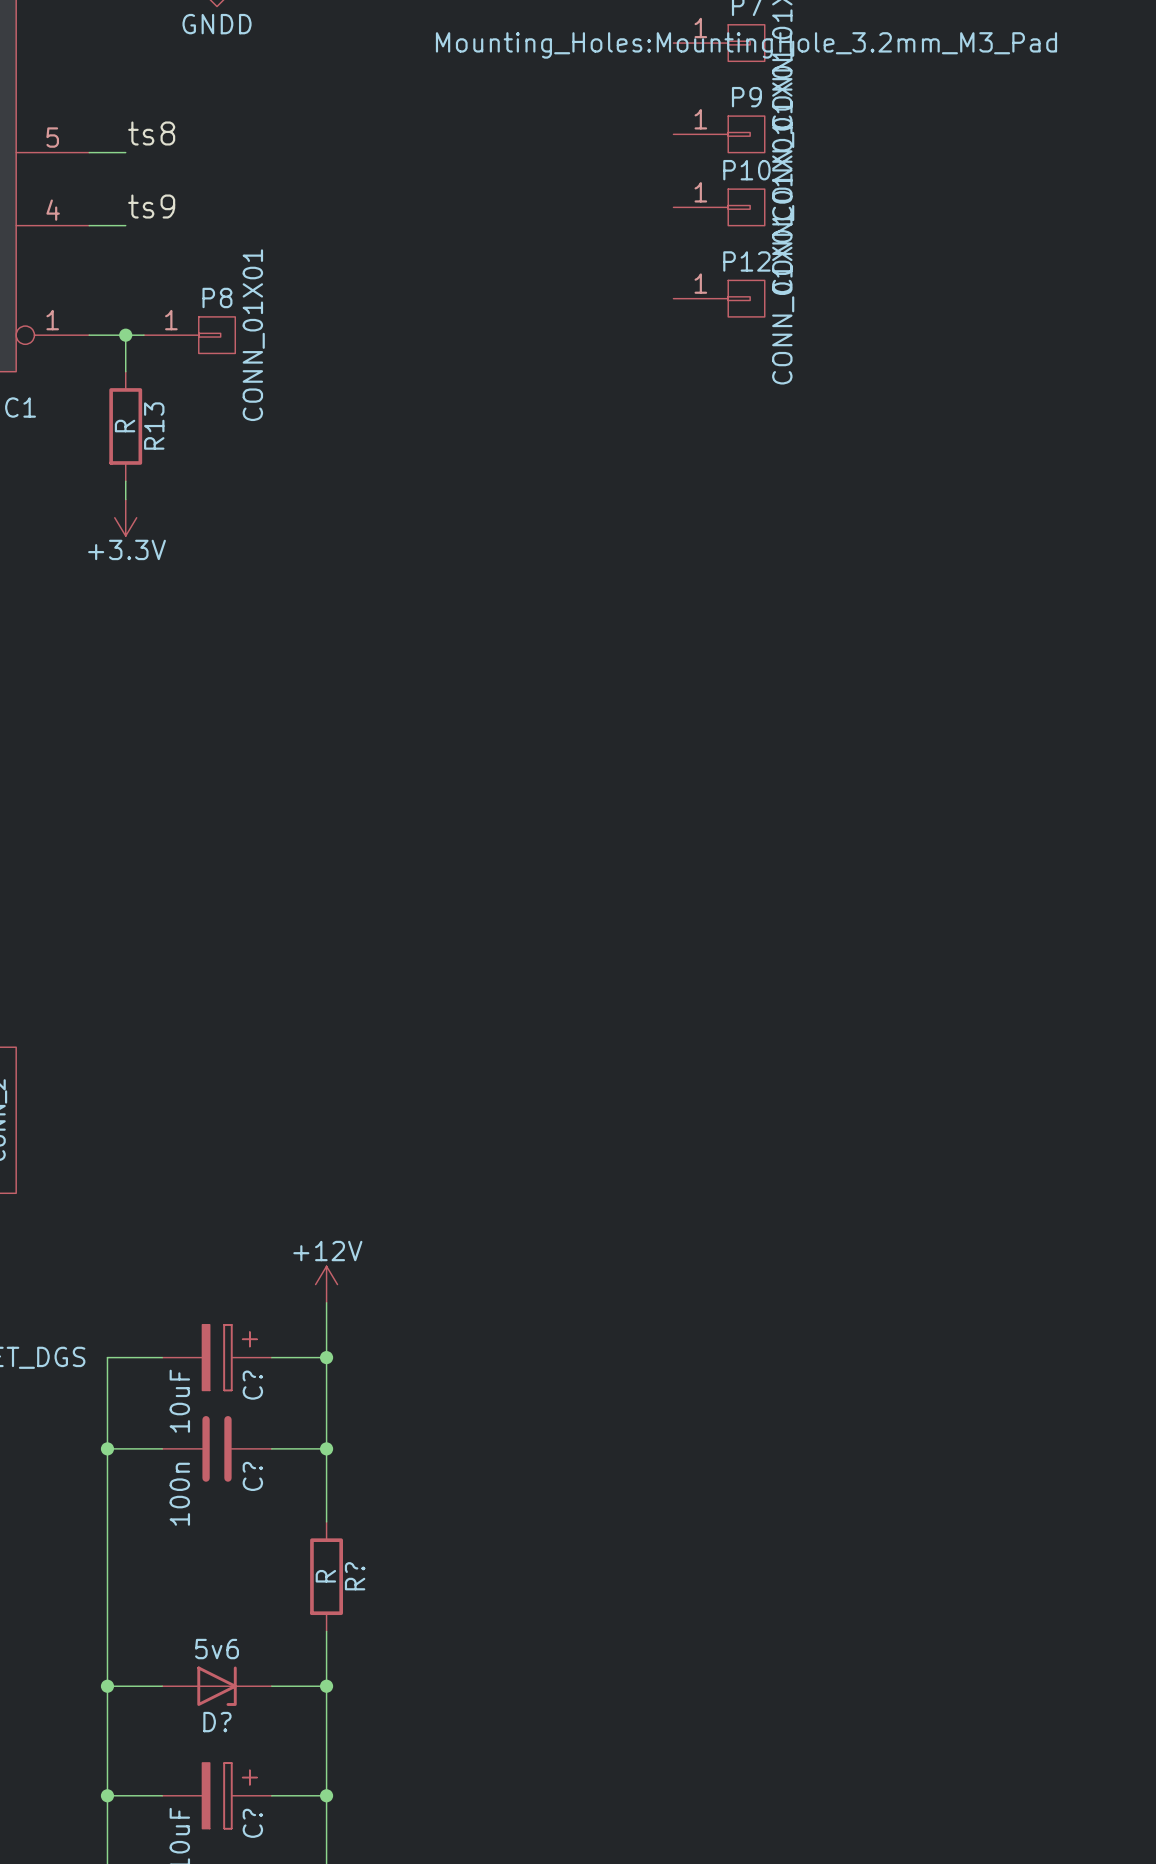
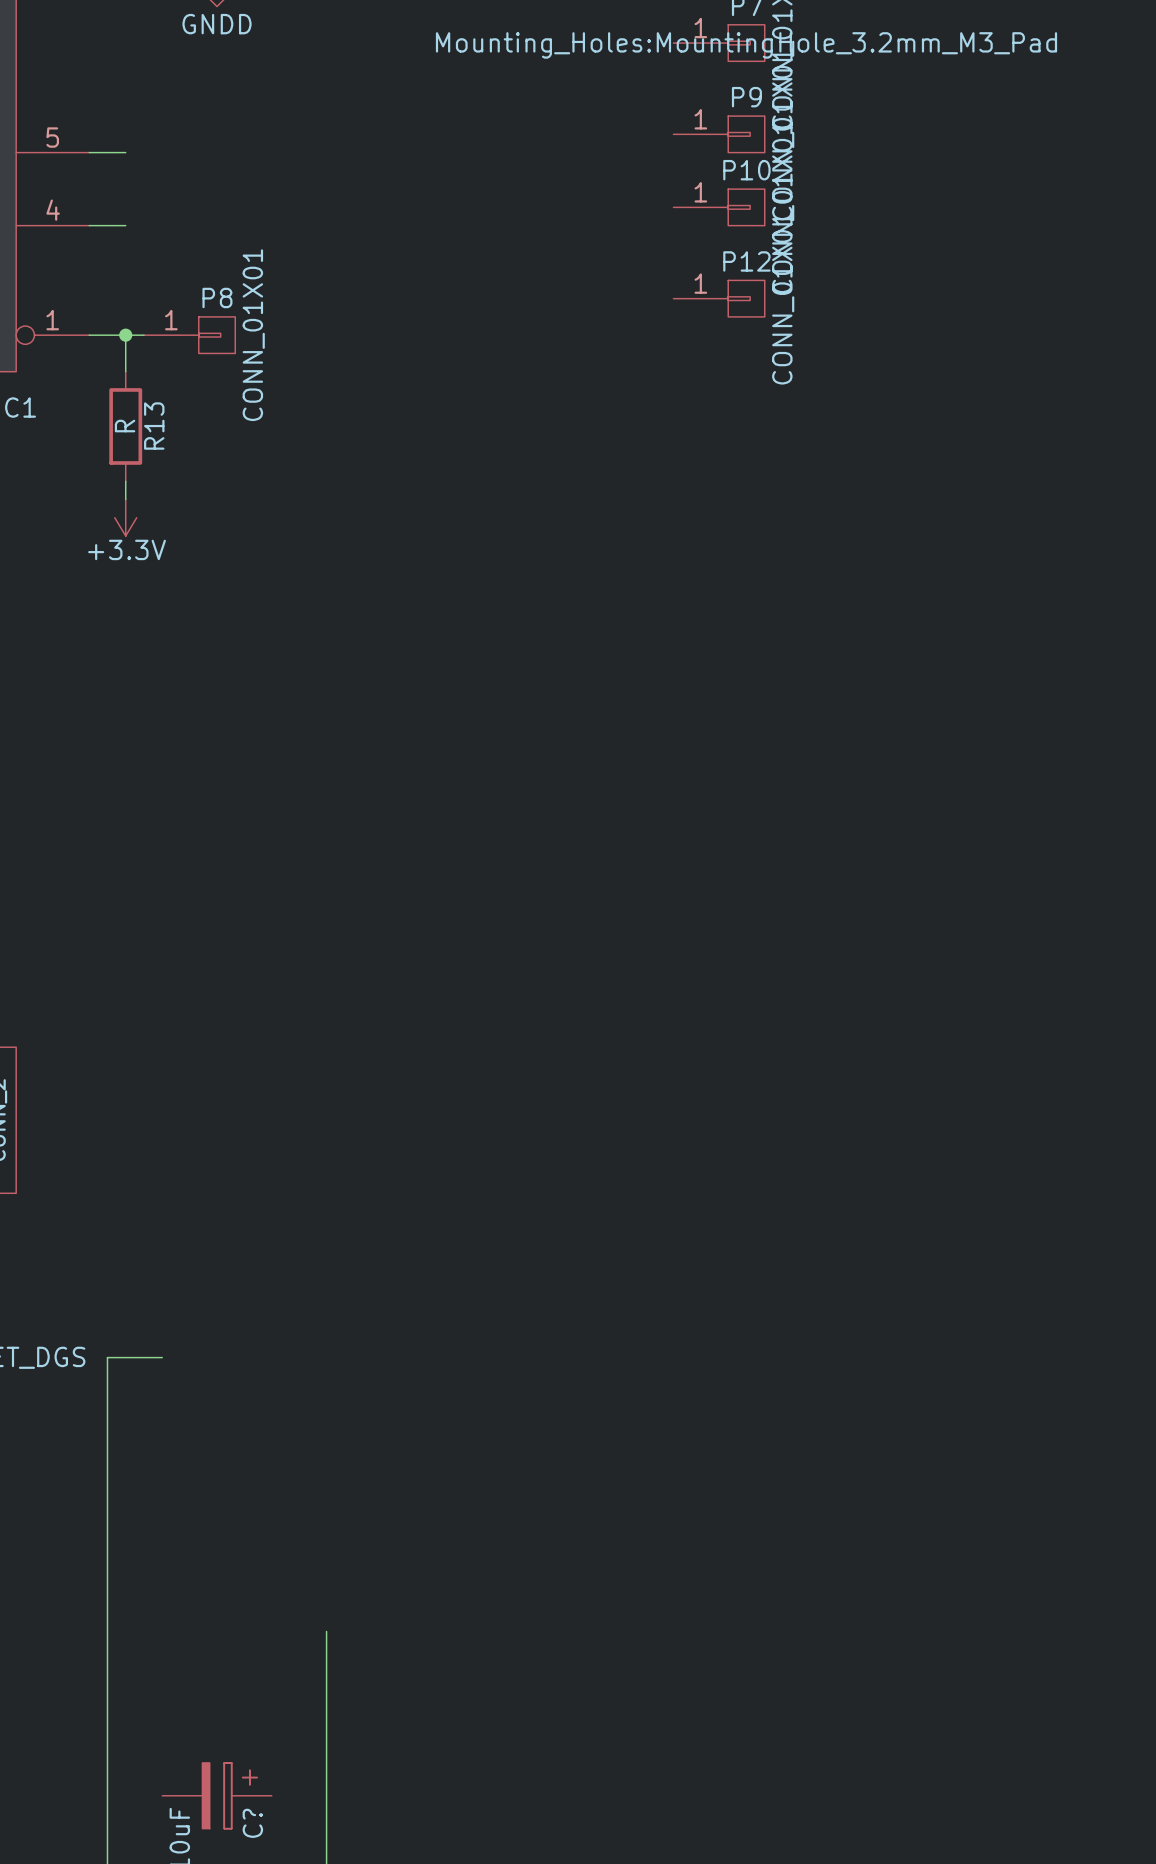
label: ts8 (151, 133) -> none
label: ts9 (151, 206) -> none
power symbol: +12V (326, 1284) -> none
wire: (326, 1302) (326, 1521) -> none
C?: 10uF (217, 1357) -> none
wire: (271, 1357) (326, 1357) -> none
junction: (326, 1357) -> none
wire: (107, 1448) (162, 1448) -> none
junction: (107, 1448) -> none
C?: 100n (217, 1448) -> none
wire: (271, 1448) (326, 1448) -> none
junction: (326, 1448) -> none
R?: R (326, 1576) -> none
wire: (107, 1686) (162, 1686) -> none
junction: (107, 1686) -> none
D?: 5v6 (217, 1686) -> none
wire: (271, 1686) (326, 1686) -> none
junction: (326, 1686) -> none
wire: (107, 1795) (162, 1795) -> none
junction: (107, 1795) -> none
wire: (271, 1795) (326, 1795) -> none
junction: (326, 1795) -> none

